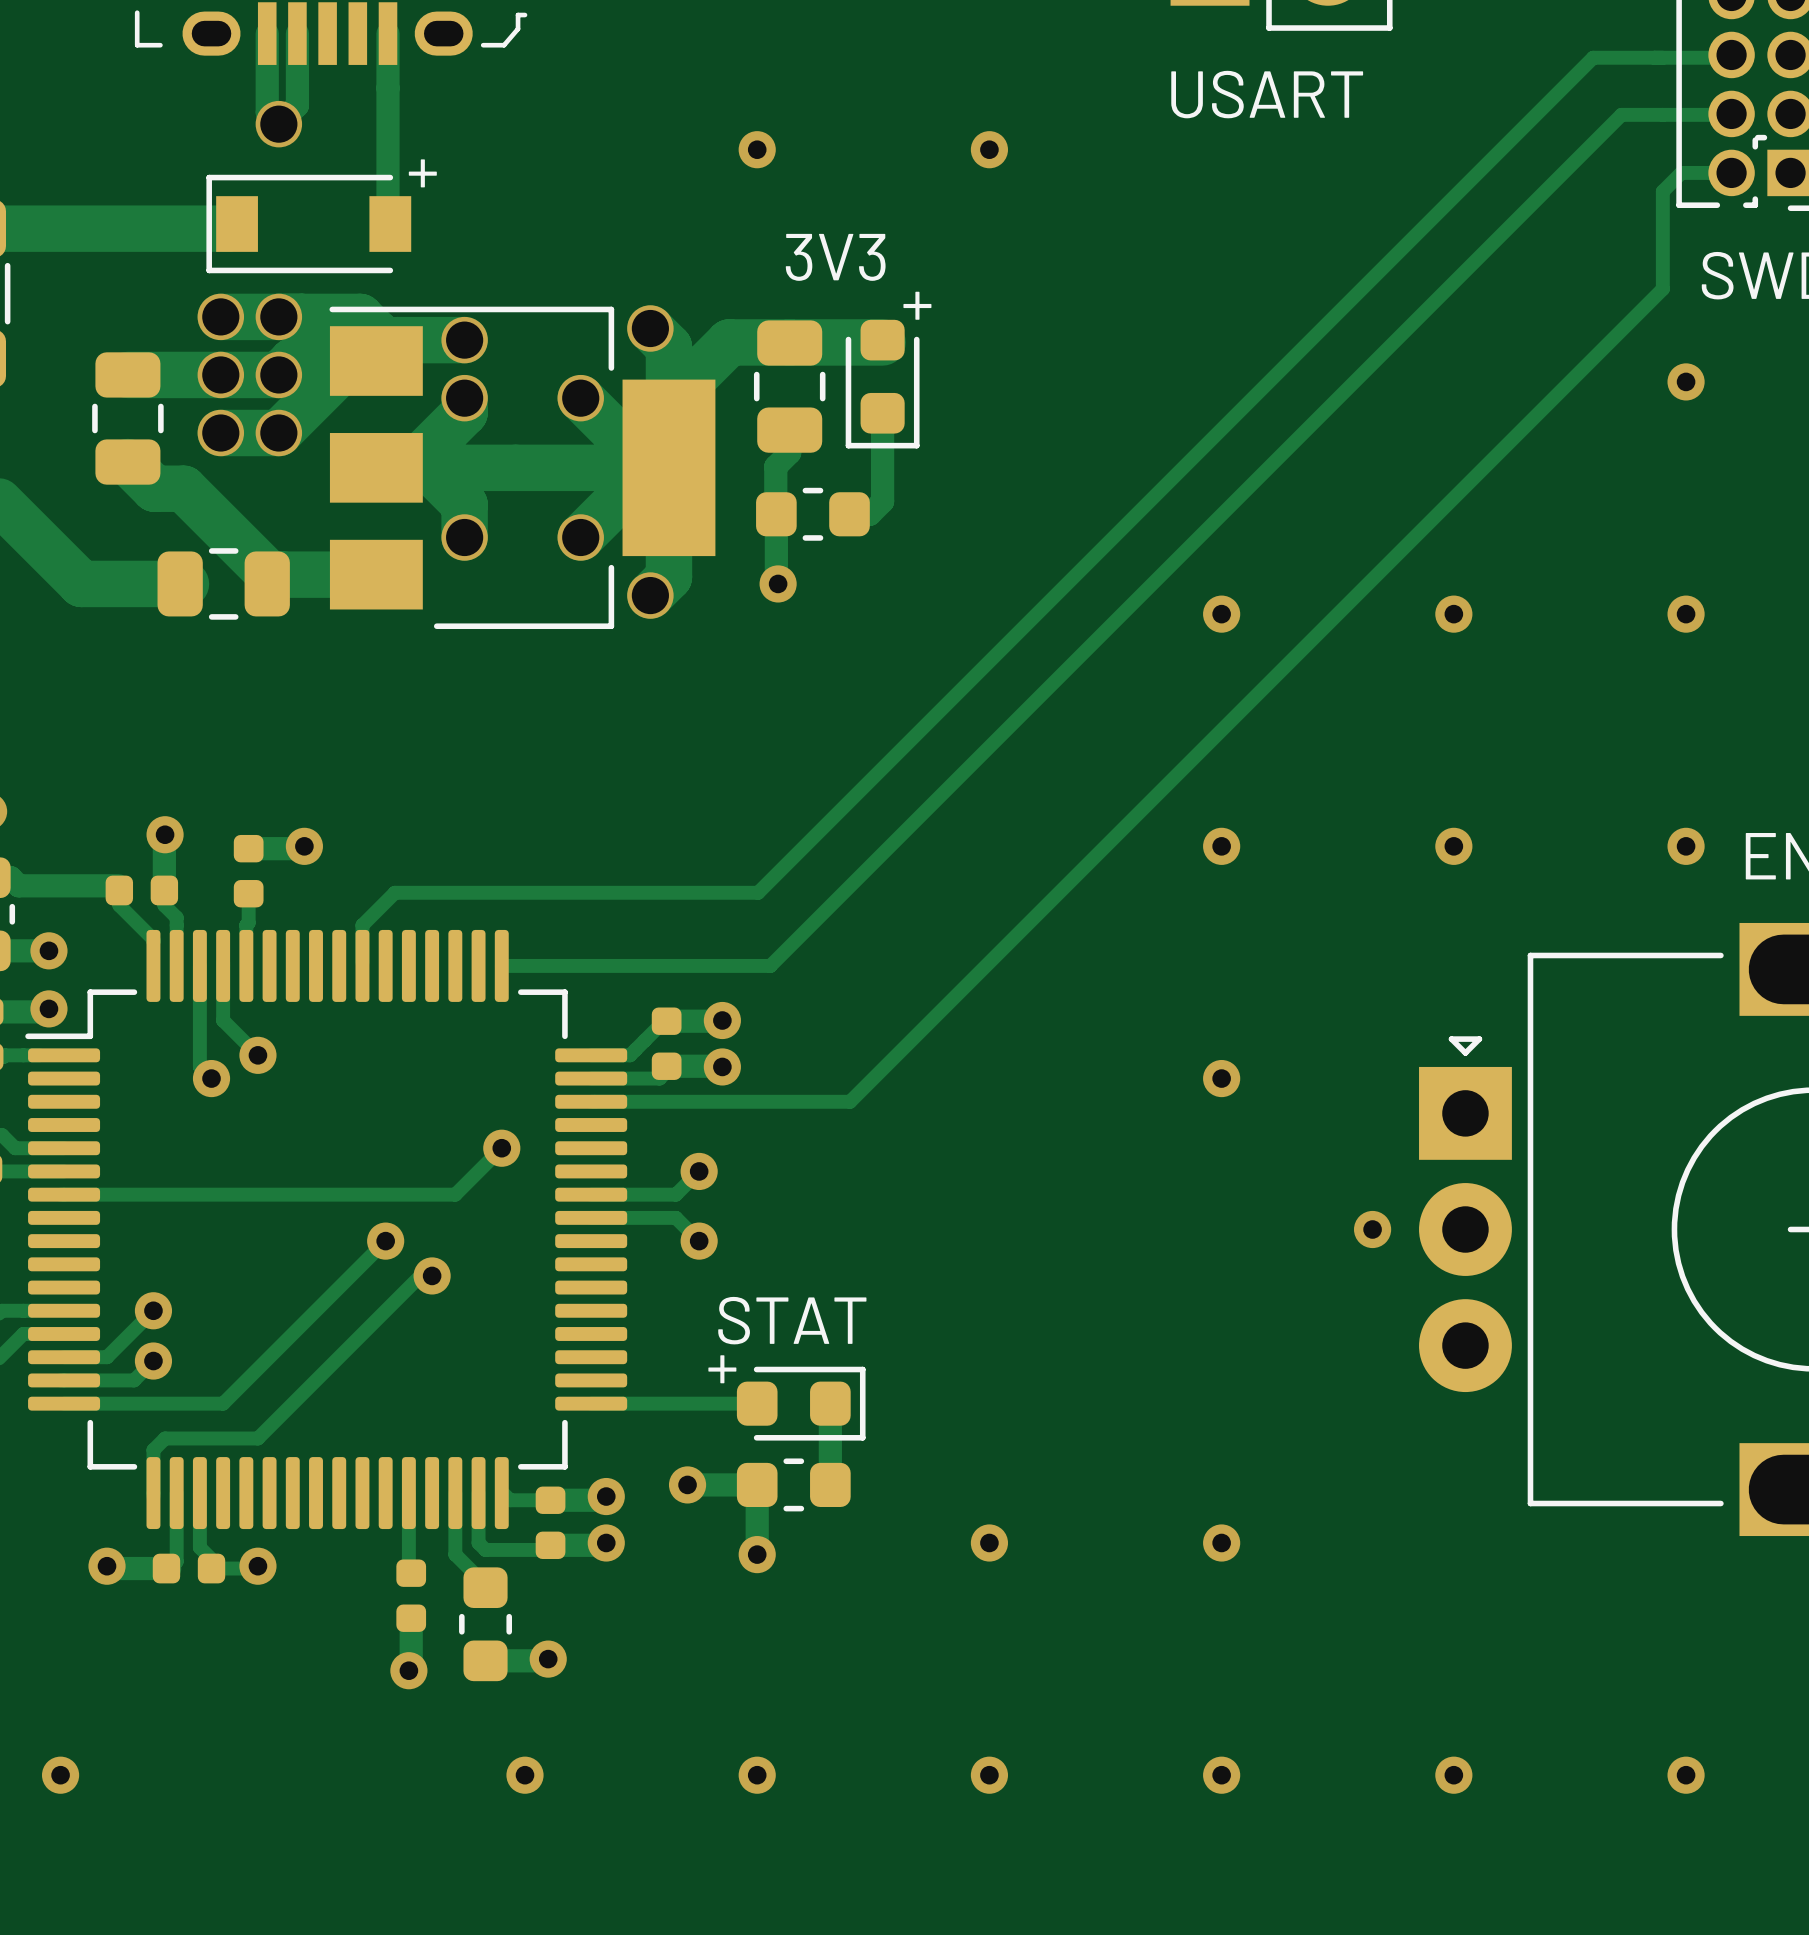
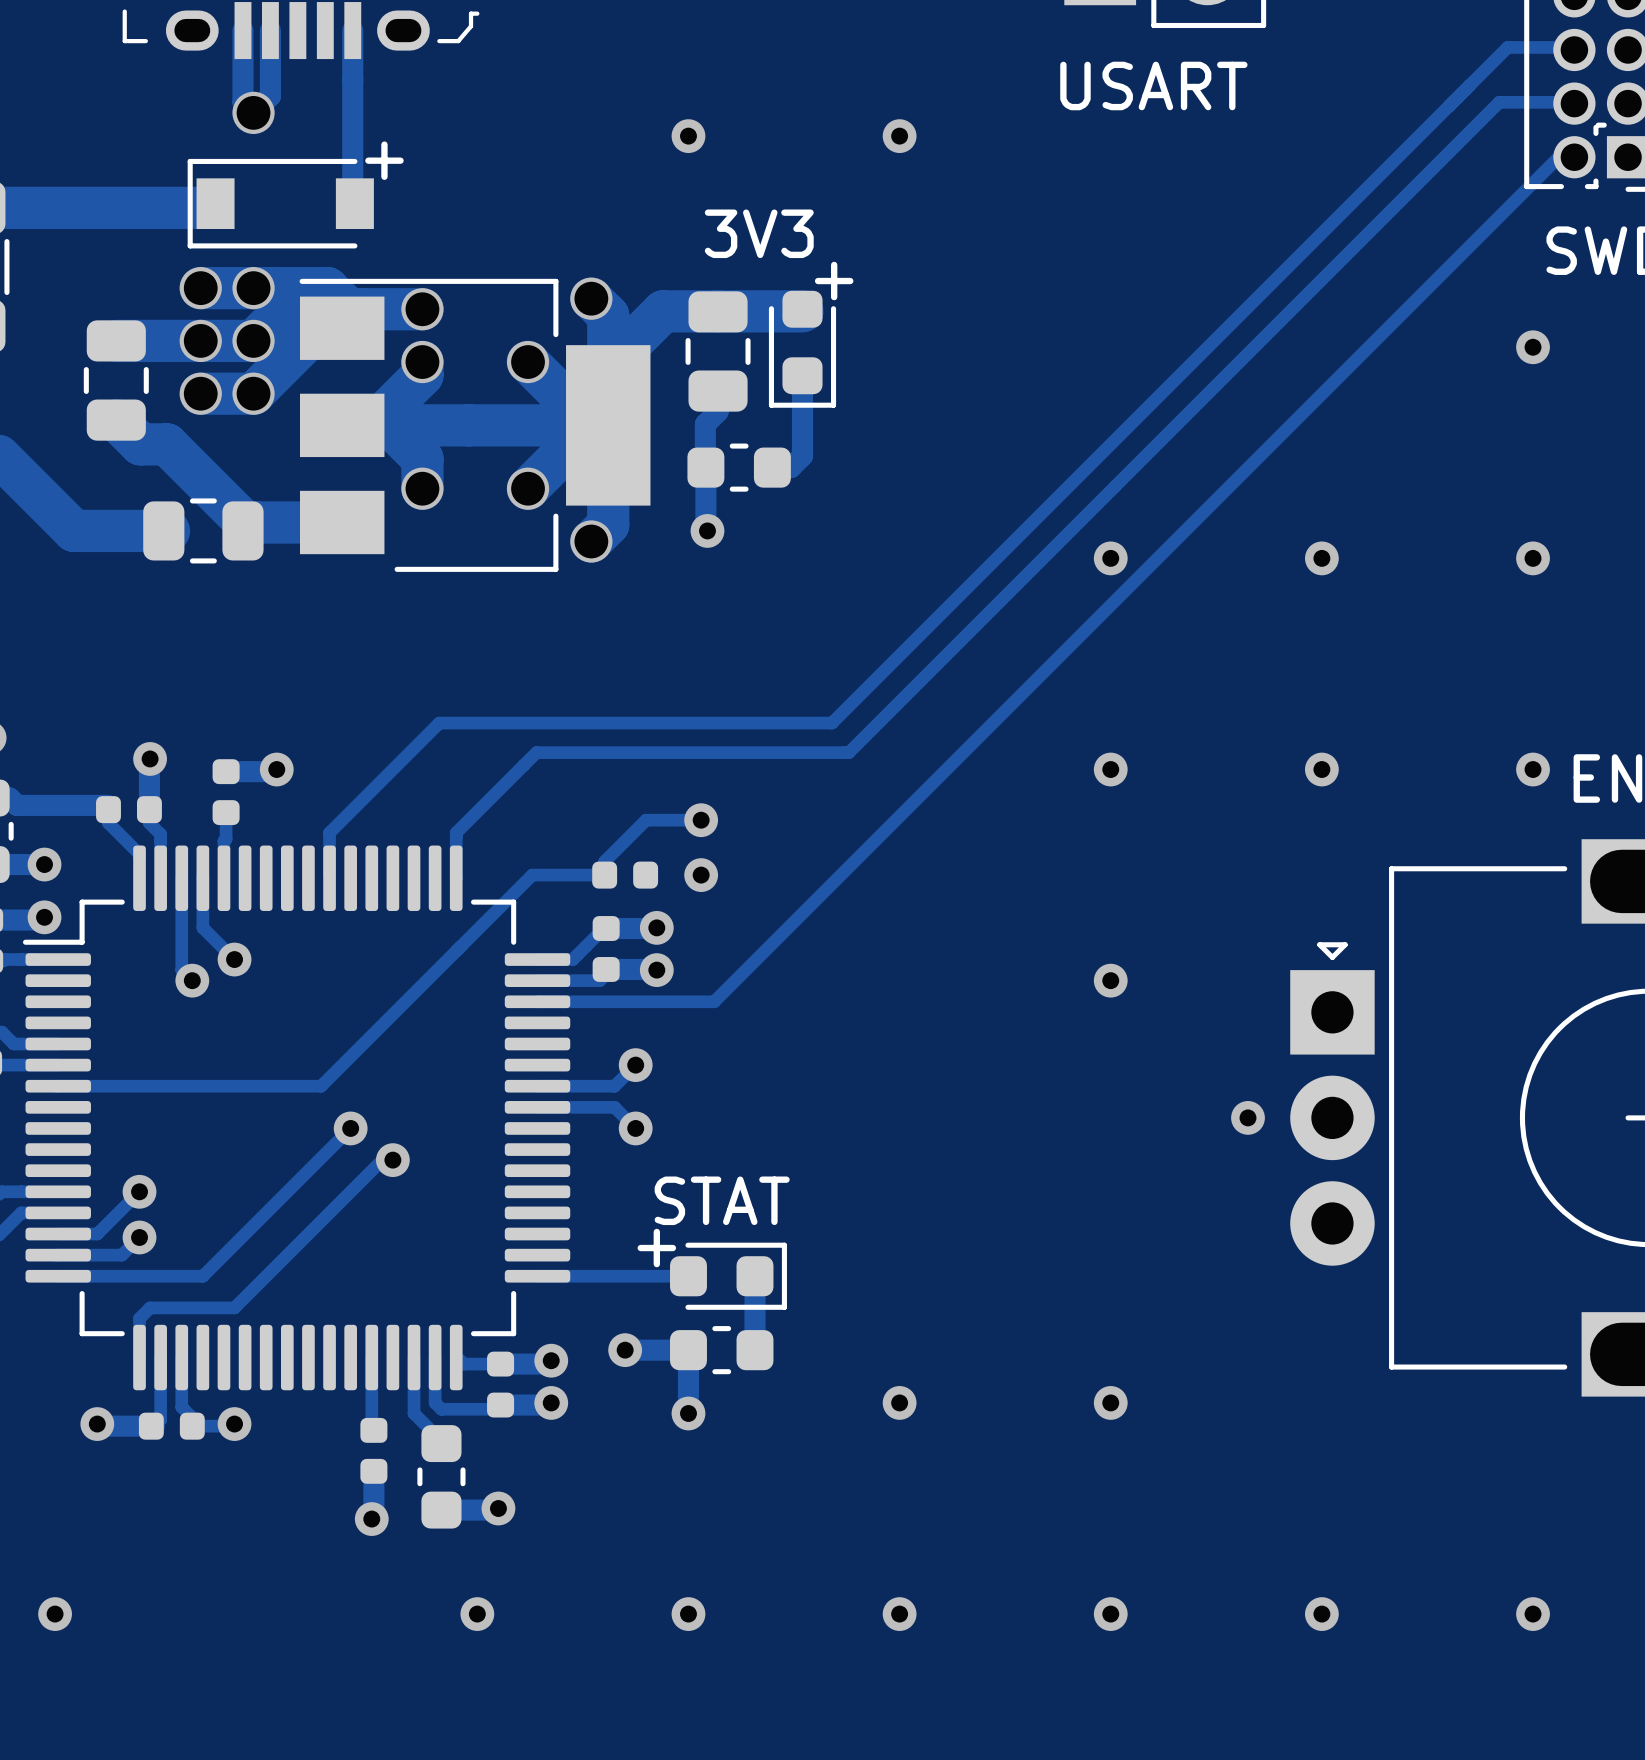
track: (1731, 57) (1593, 57) (758, 892) (394, 892) (362, 925) -> (1571, 47) (1507, 47) (832, 723) (439, 723) (329, 832) (329, 841)
track: (1730, 114) (1621, 114) (770, 965) (501, 965) -> (1575, 102) (1499, 102) (848, 752) (536, 752) (456, 832) (456, 879)
track: (1714, 172) (1681, 172) (1662, 191) (1662, 289) (850, 1101) (785, 1101) -> (1558, 157) (714, 1001)
track: none -> (701, 820) (646, 820) (604, 861) (604, 875)
via: none -> (701, 820)
part: none -> (625, 875)
via: none -> (701, 875)
track: (501, 1148) (455, 1194) (353, 1194) -> (604, 875) (532, 875) (321, 1086)
via: (501, 1148) -> none

